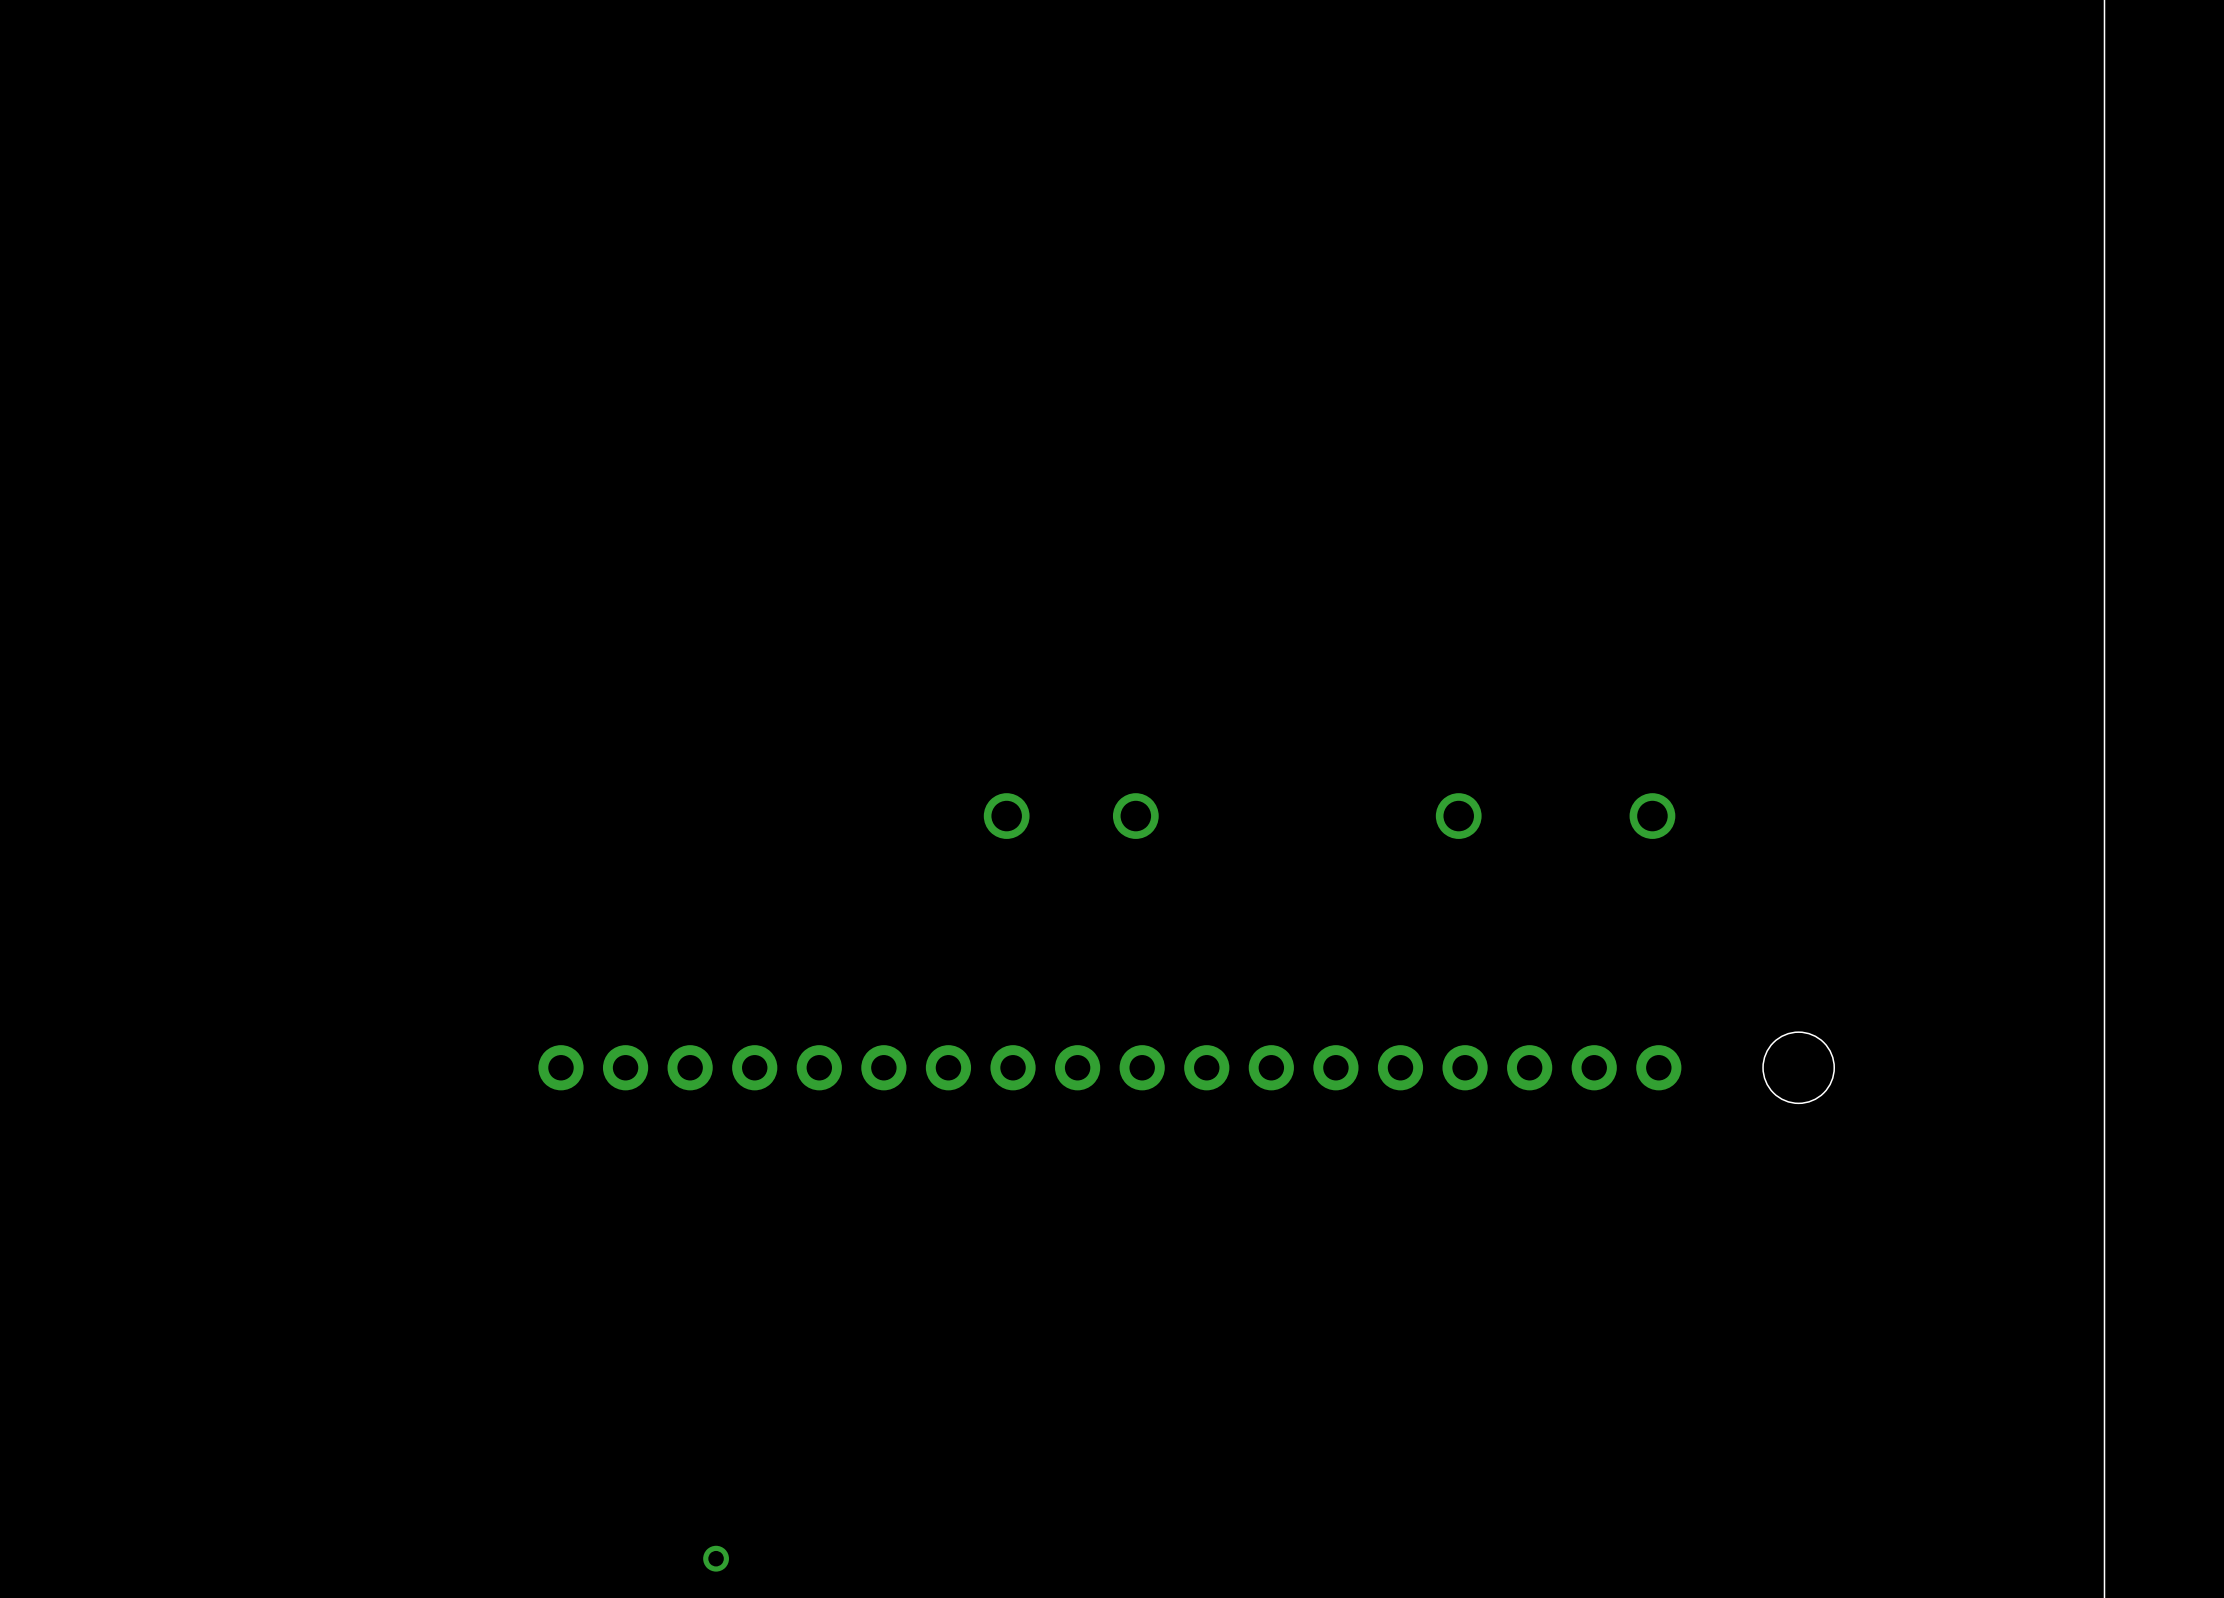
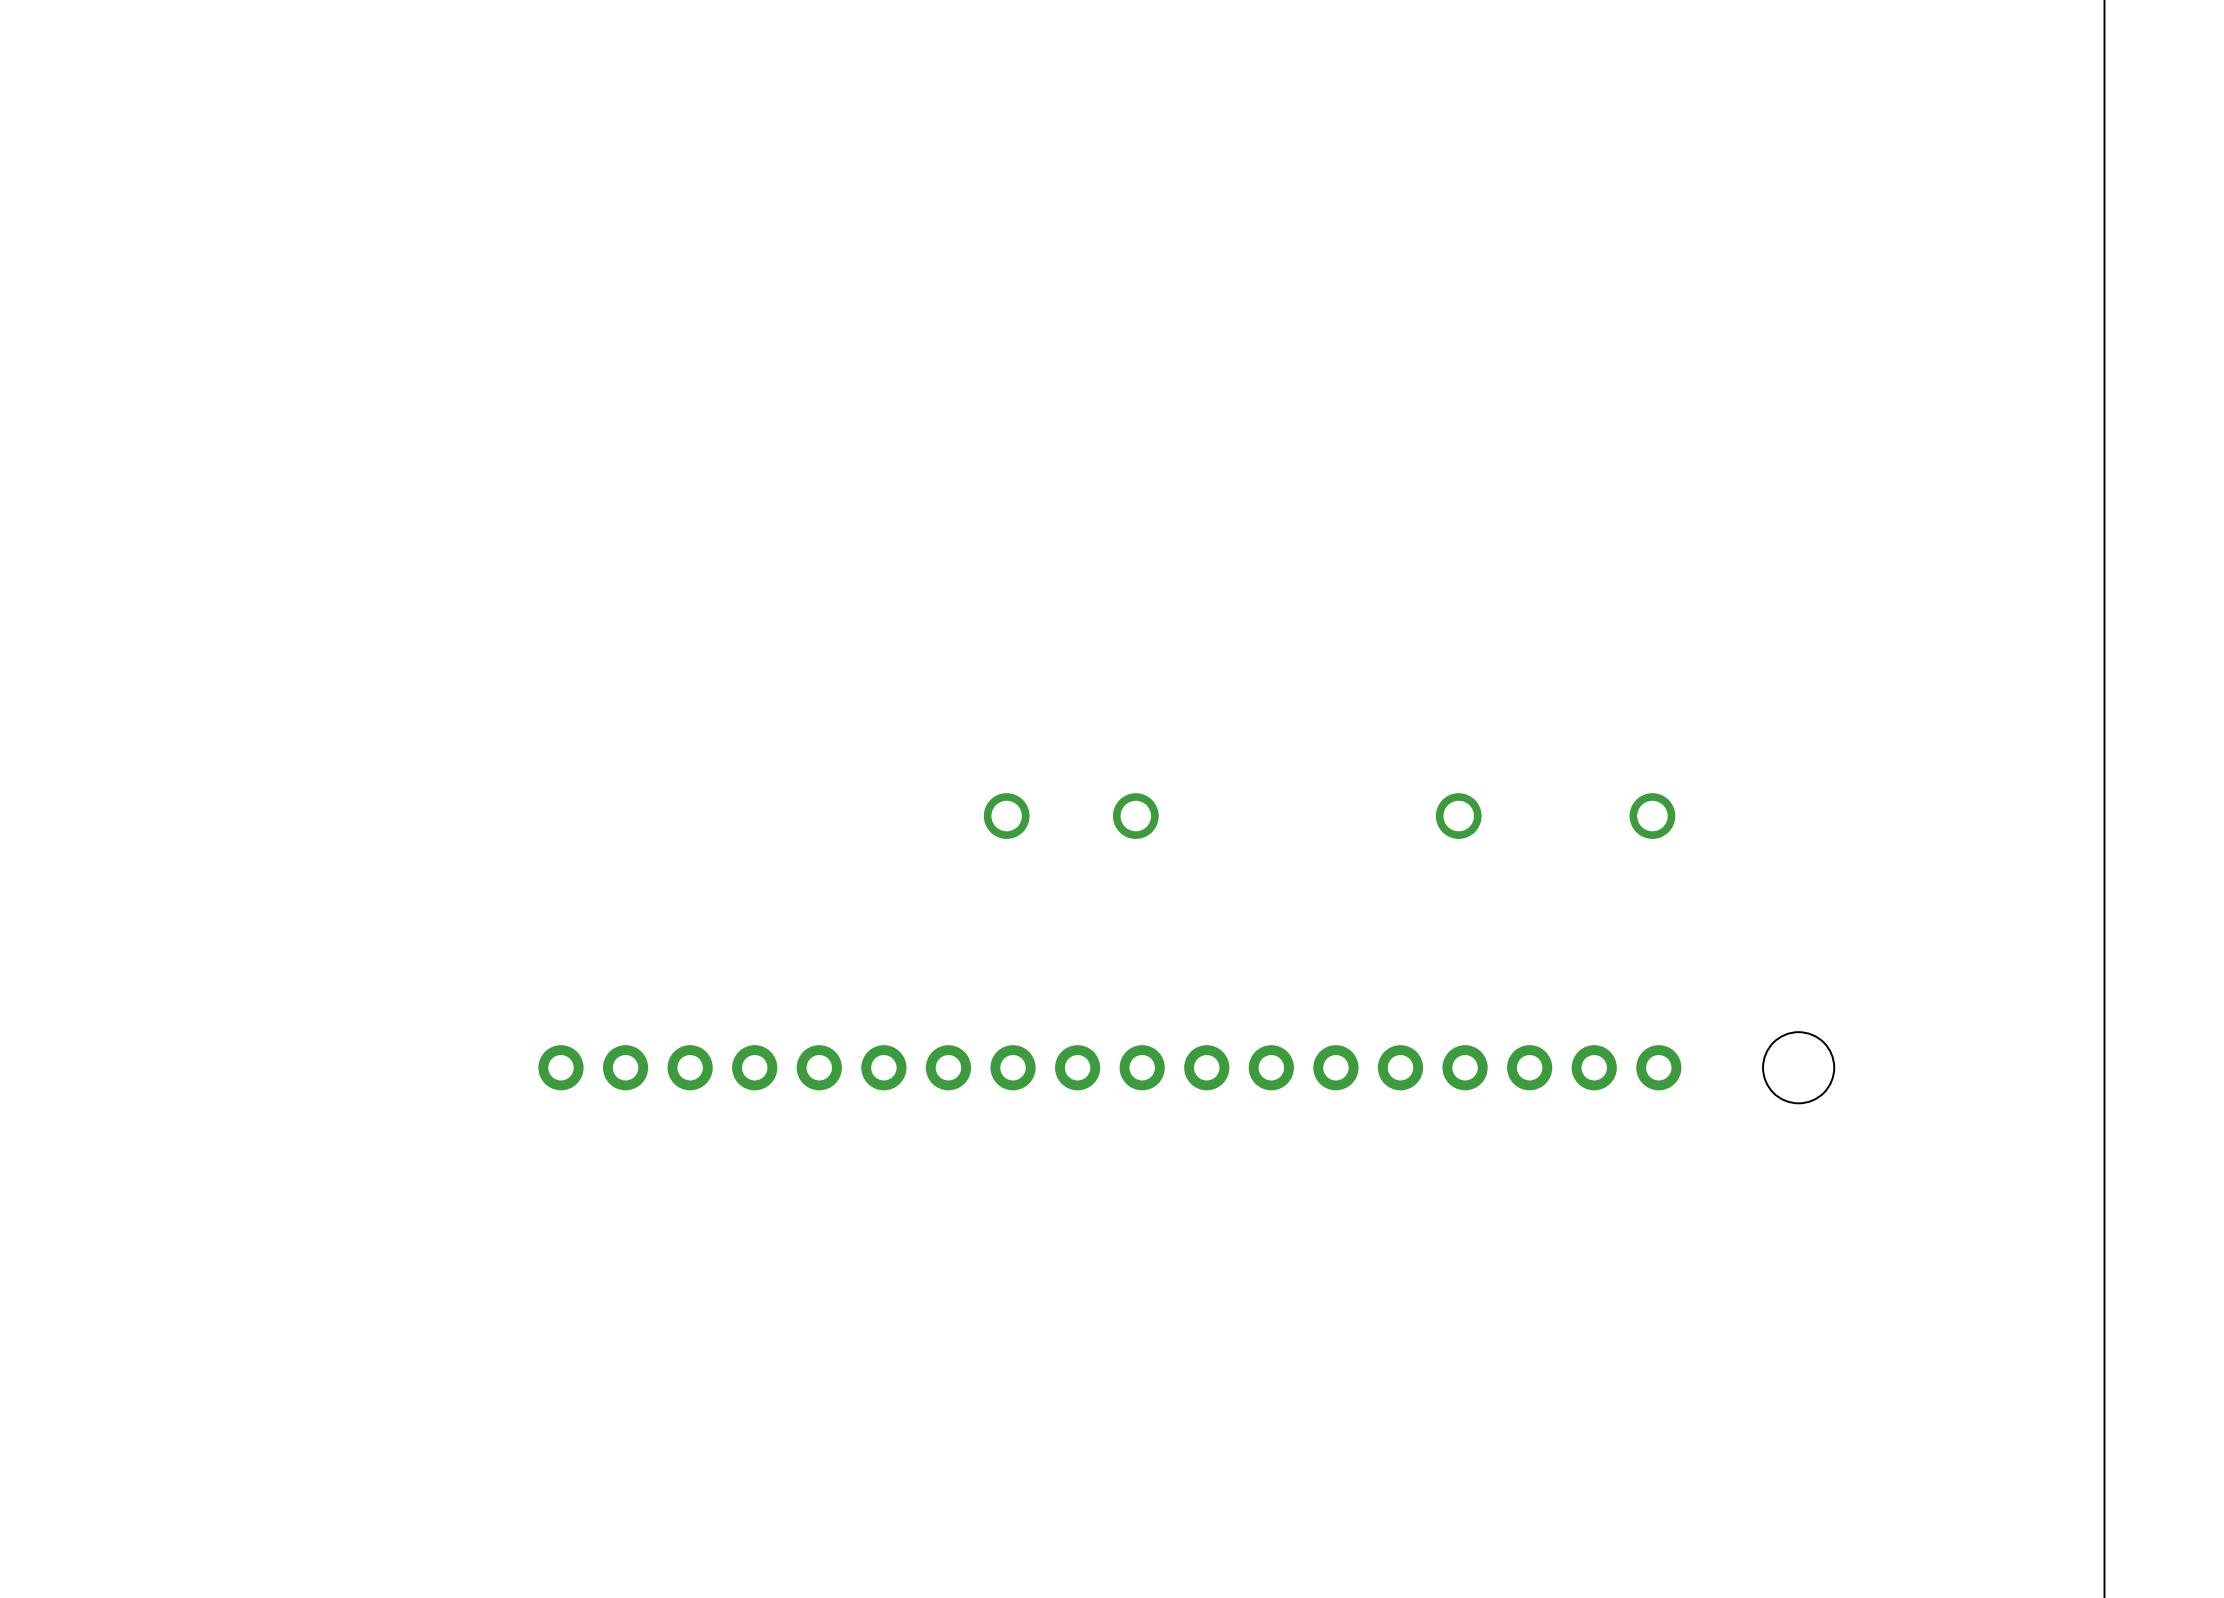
via: (716, 1558) -> none

